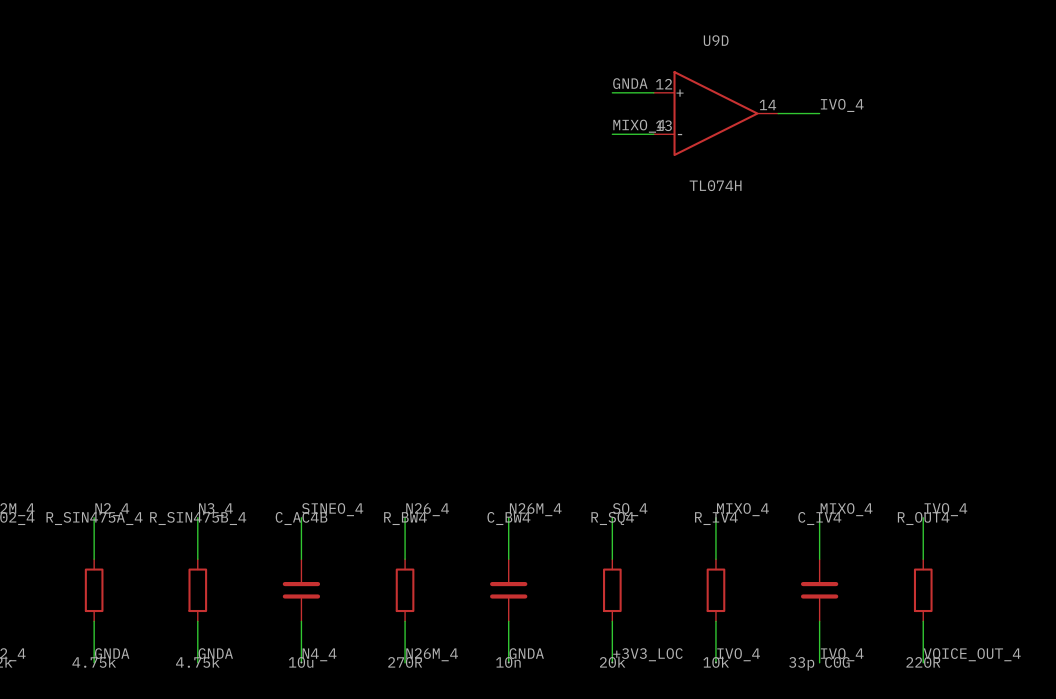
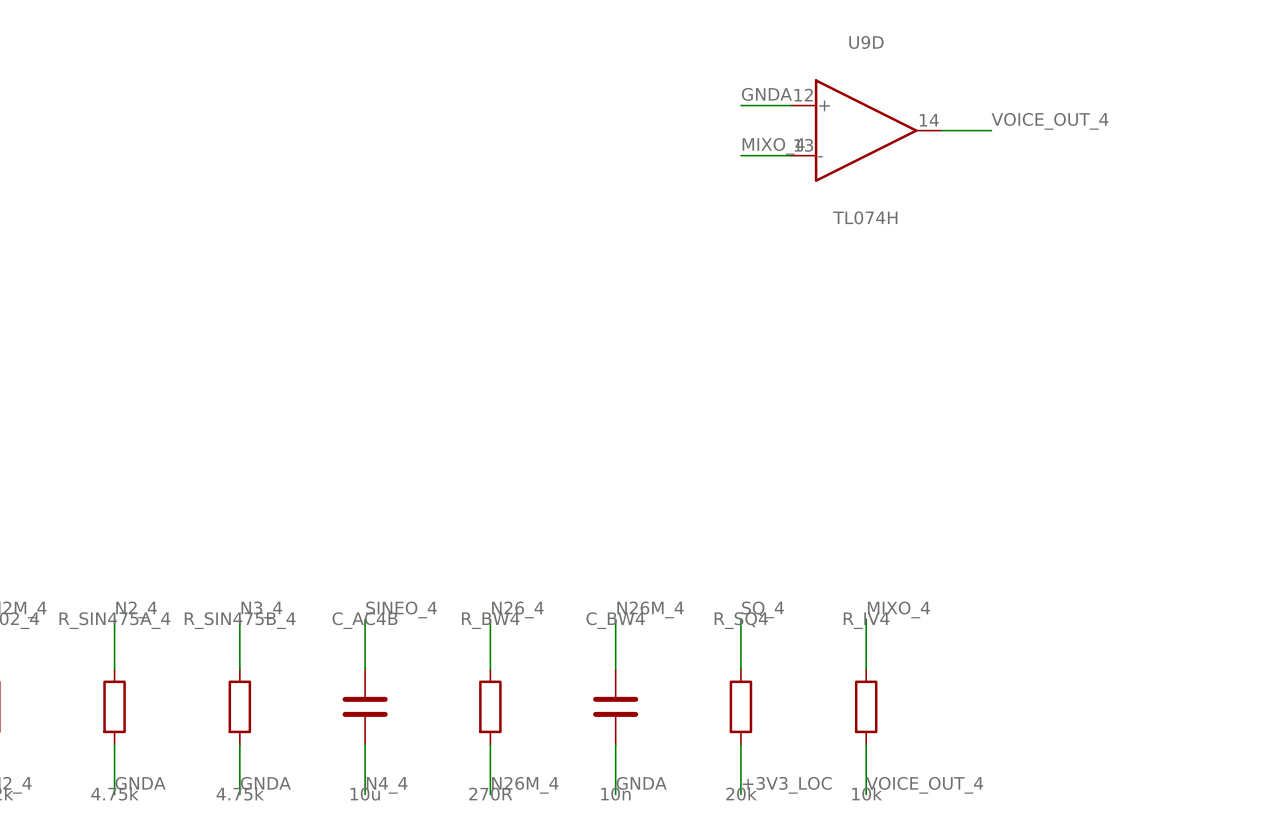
label: IVO_4 (842, 105) -> VOICE_OUT_4 (1050, 121)
label: MIXO_4 (846, 509) -> none
label: IVO_4 (945, 509) -> none
wire: (819, 517) (819, 559) -> none
wire: (923, 517) (923, 559) -> none
C_IV4: 33p C0G (819, 590) -> none
R_OUT4: 220R (923, 590) -> none
wire: (819, 621) (819, 662) -> none
wire: (923, 621) (923, 662) -> none
label: IVO_4 (738, 654) -> VOICE_OUT_4 (924, 785)
label: IVO_4 (842, 654) -> none
label: VOICE_OUT_4 (972, 654) -> none

